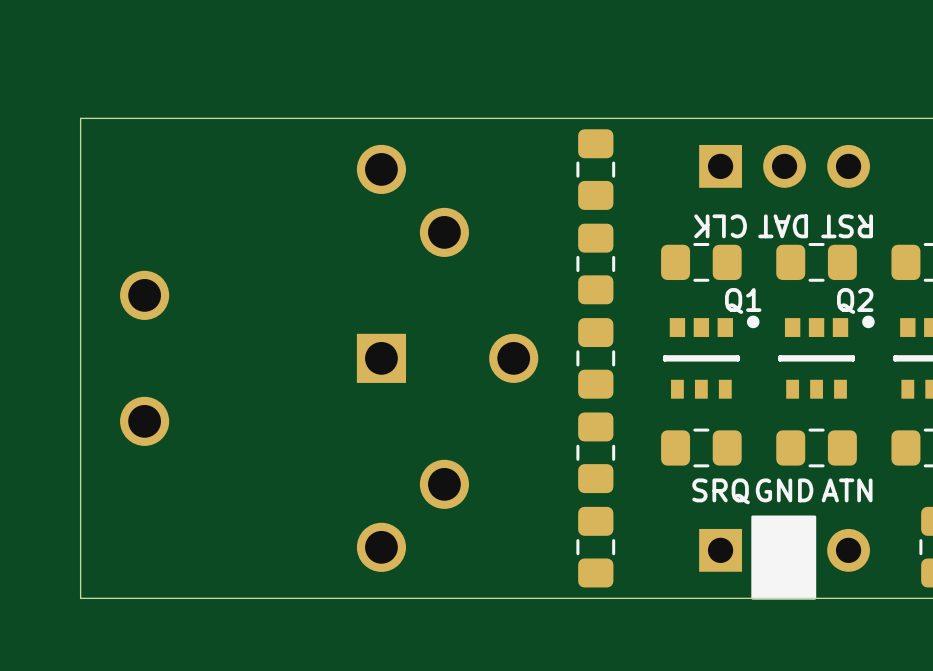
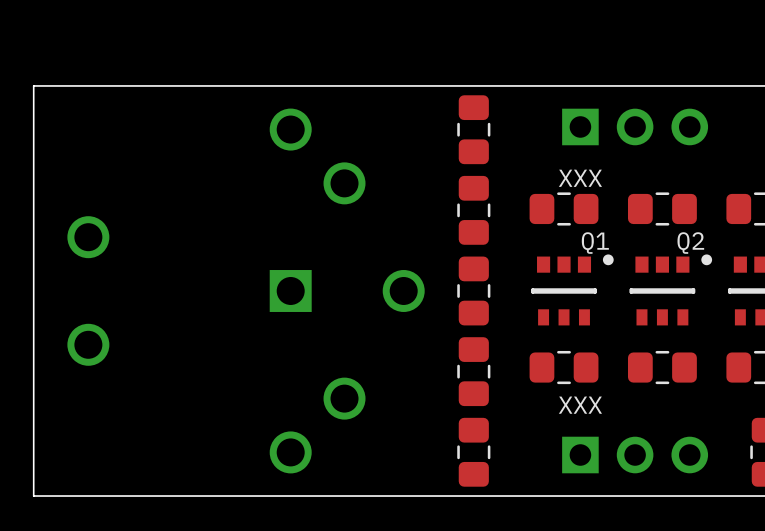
text: CLK (720, 226) -> XXX (580, 178)
text: DAT (783, 226) -> none
text: RST (847, 226) -> none
text: GND (784, 490) -> none
text: ATN (847, 490) -> none
text: SRQ (721, 491) -> XXX (580, 405)
drawing: [751, 515, 817, 600] -> none

